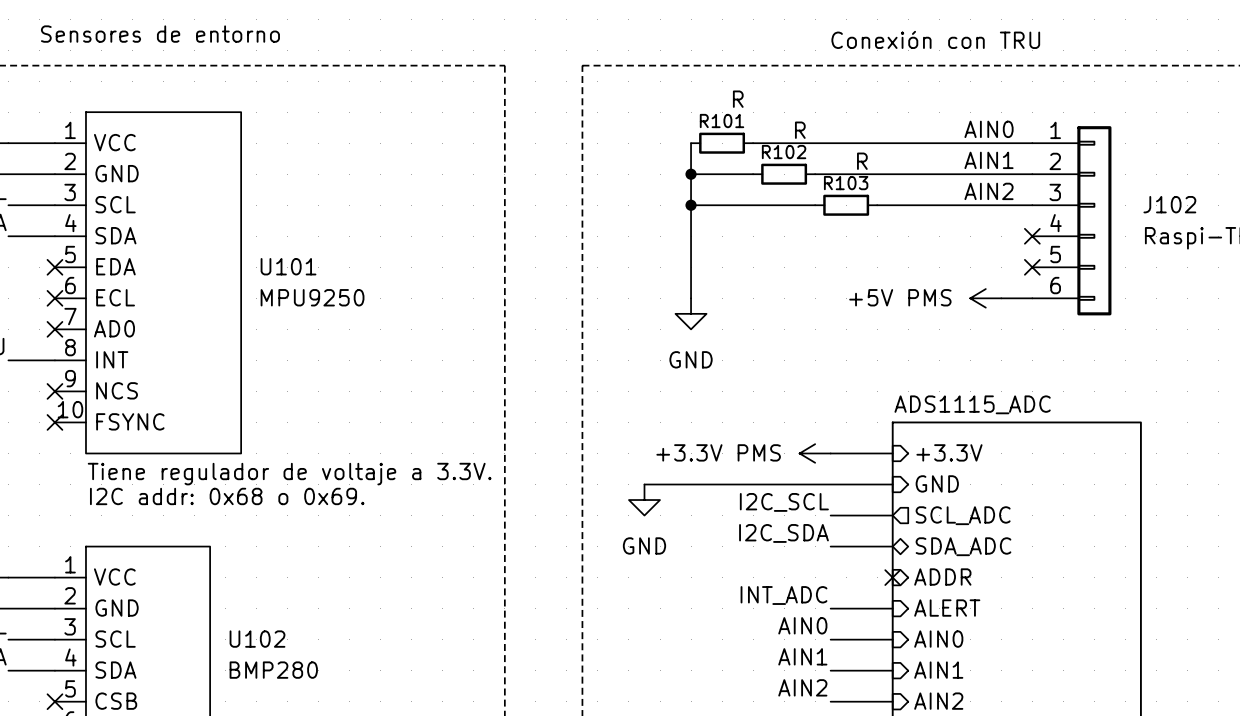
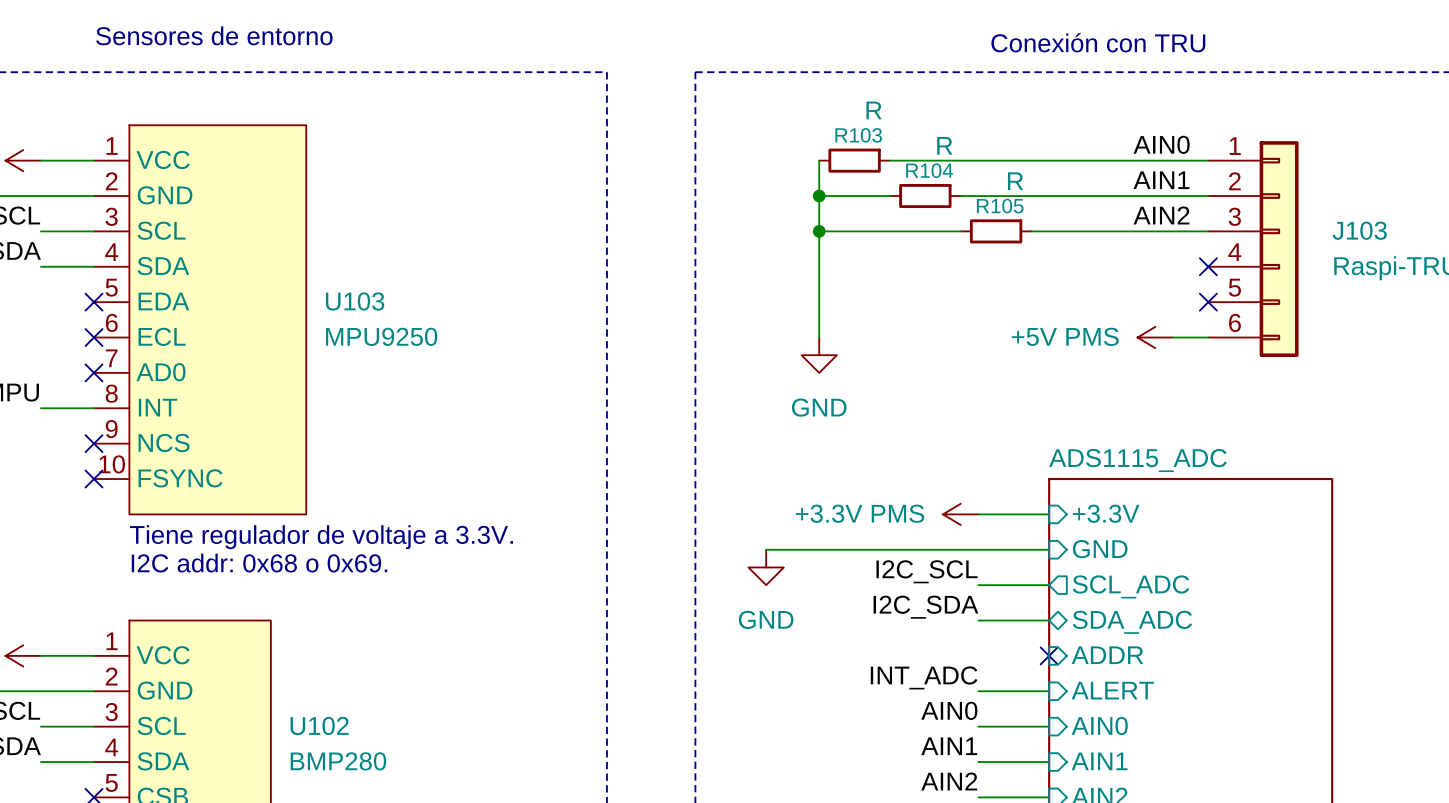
R101 name: R101 (722, 121) -> R103 (858, 135)
R102 name: R102 (784, 152) -> R104 (929, 170)
R103 name: R103 (846, 183) -> R105 (1000, 206)
J102 name: J102 (1169, 204) -> J103 (1359, 230)
U101 name: U101 (288, 266) -> U103 (355, 301)

